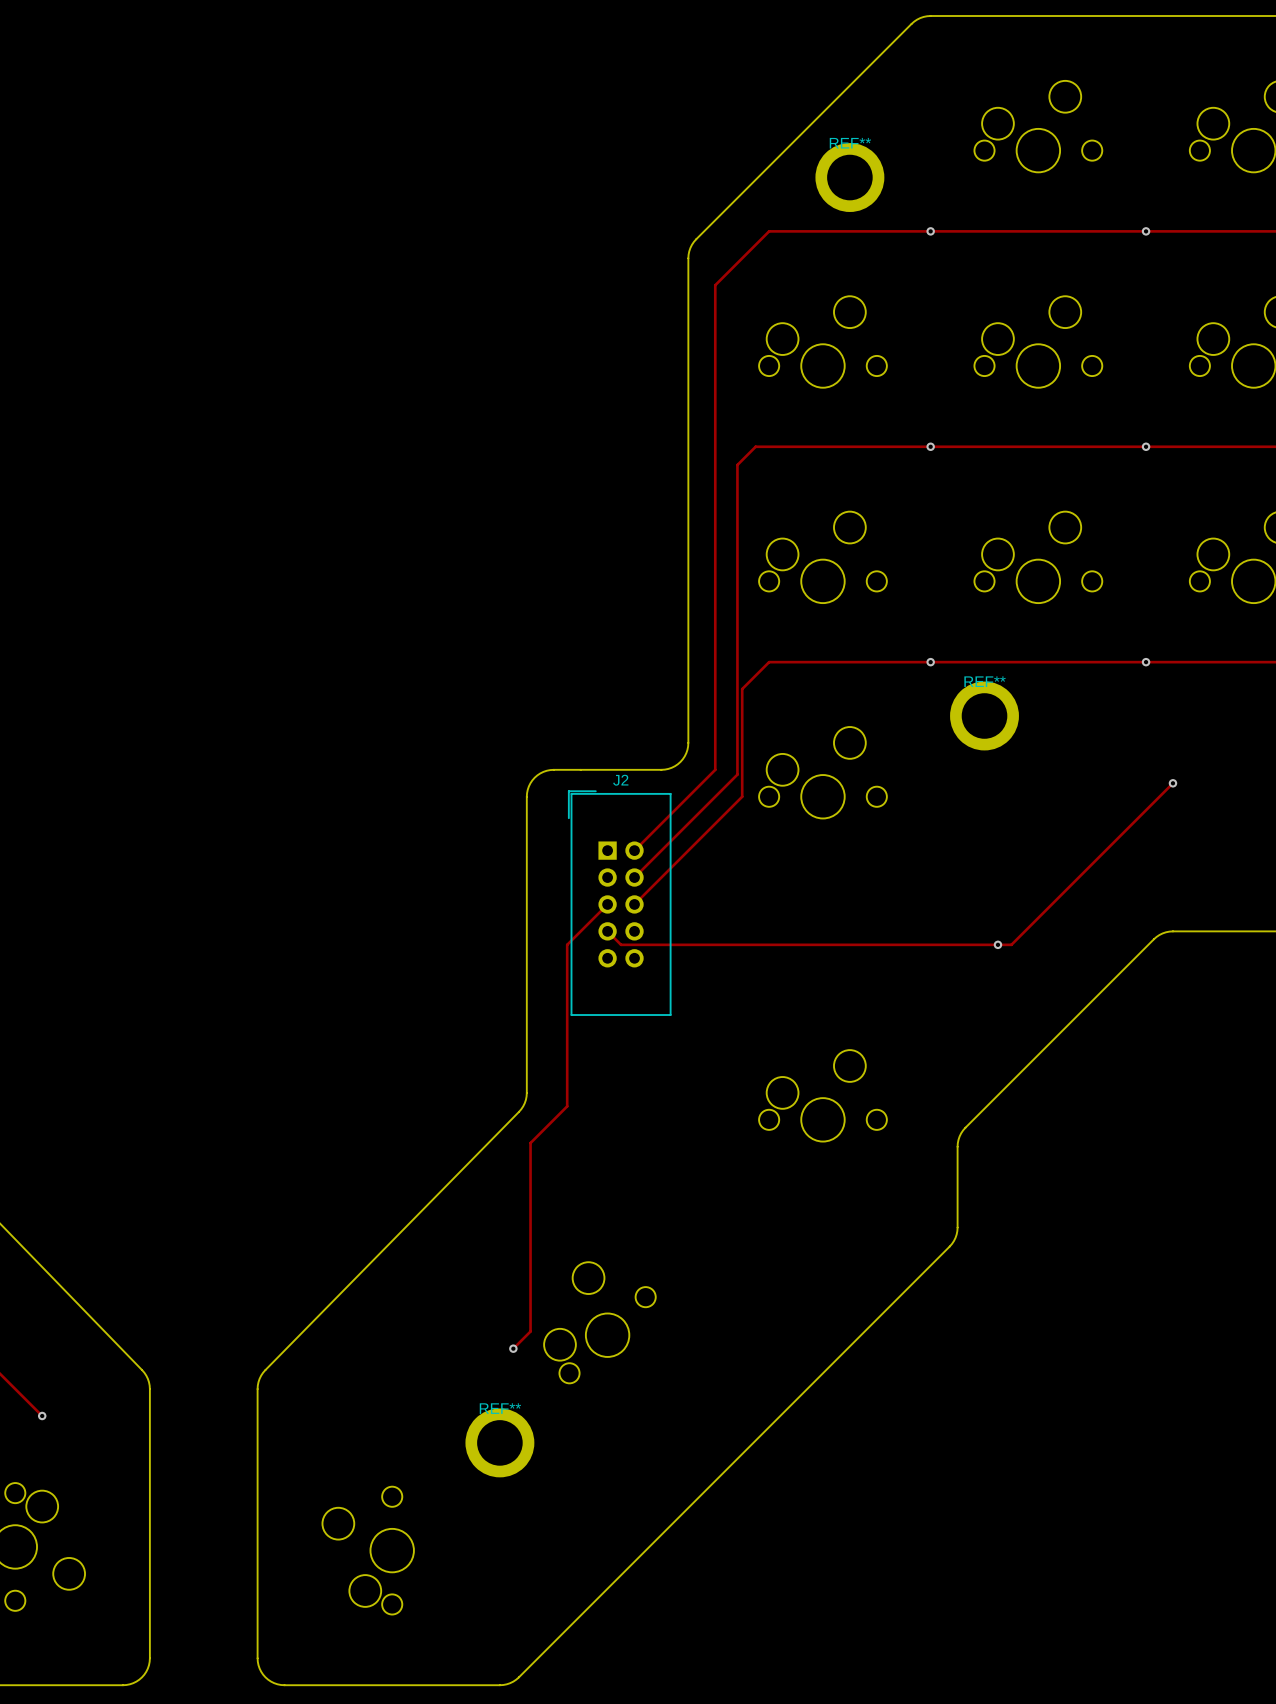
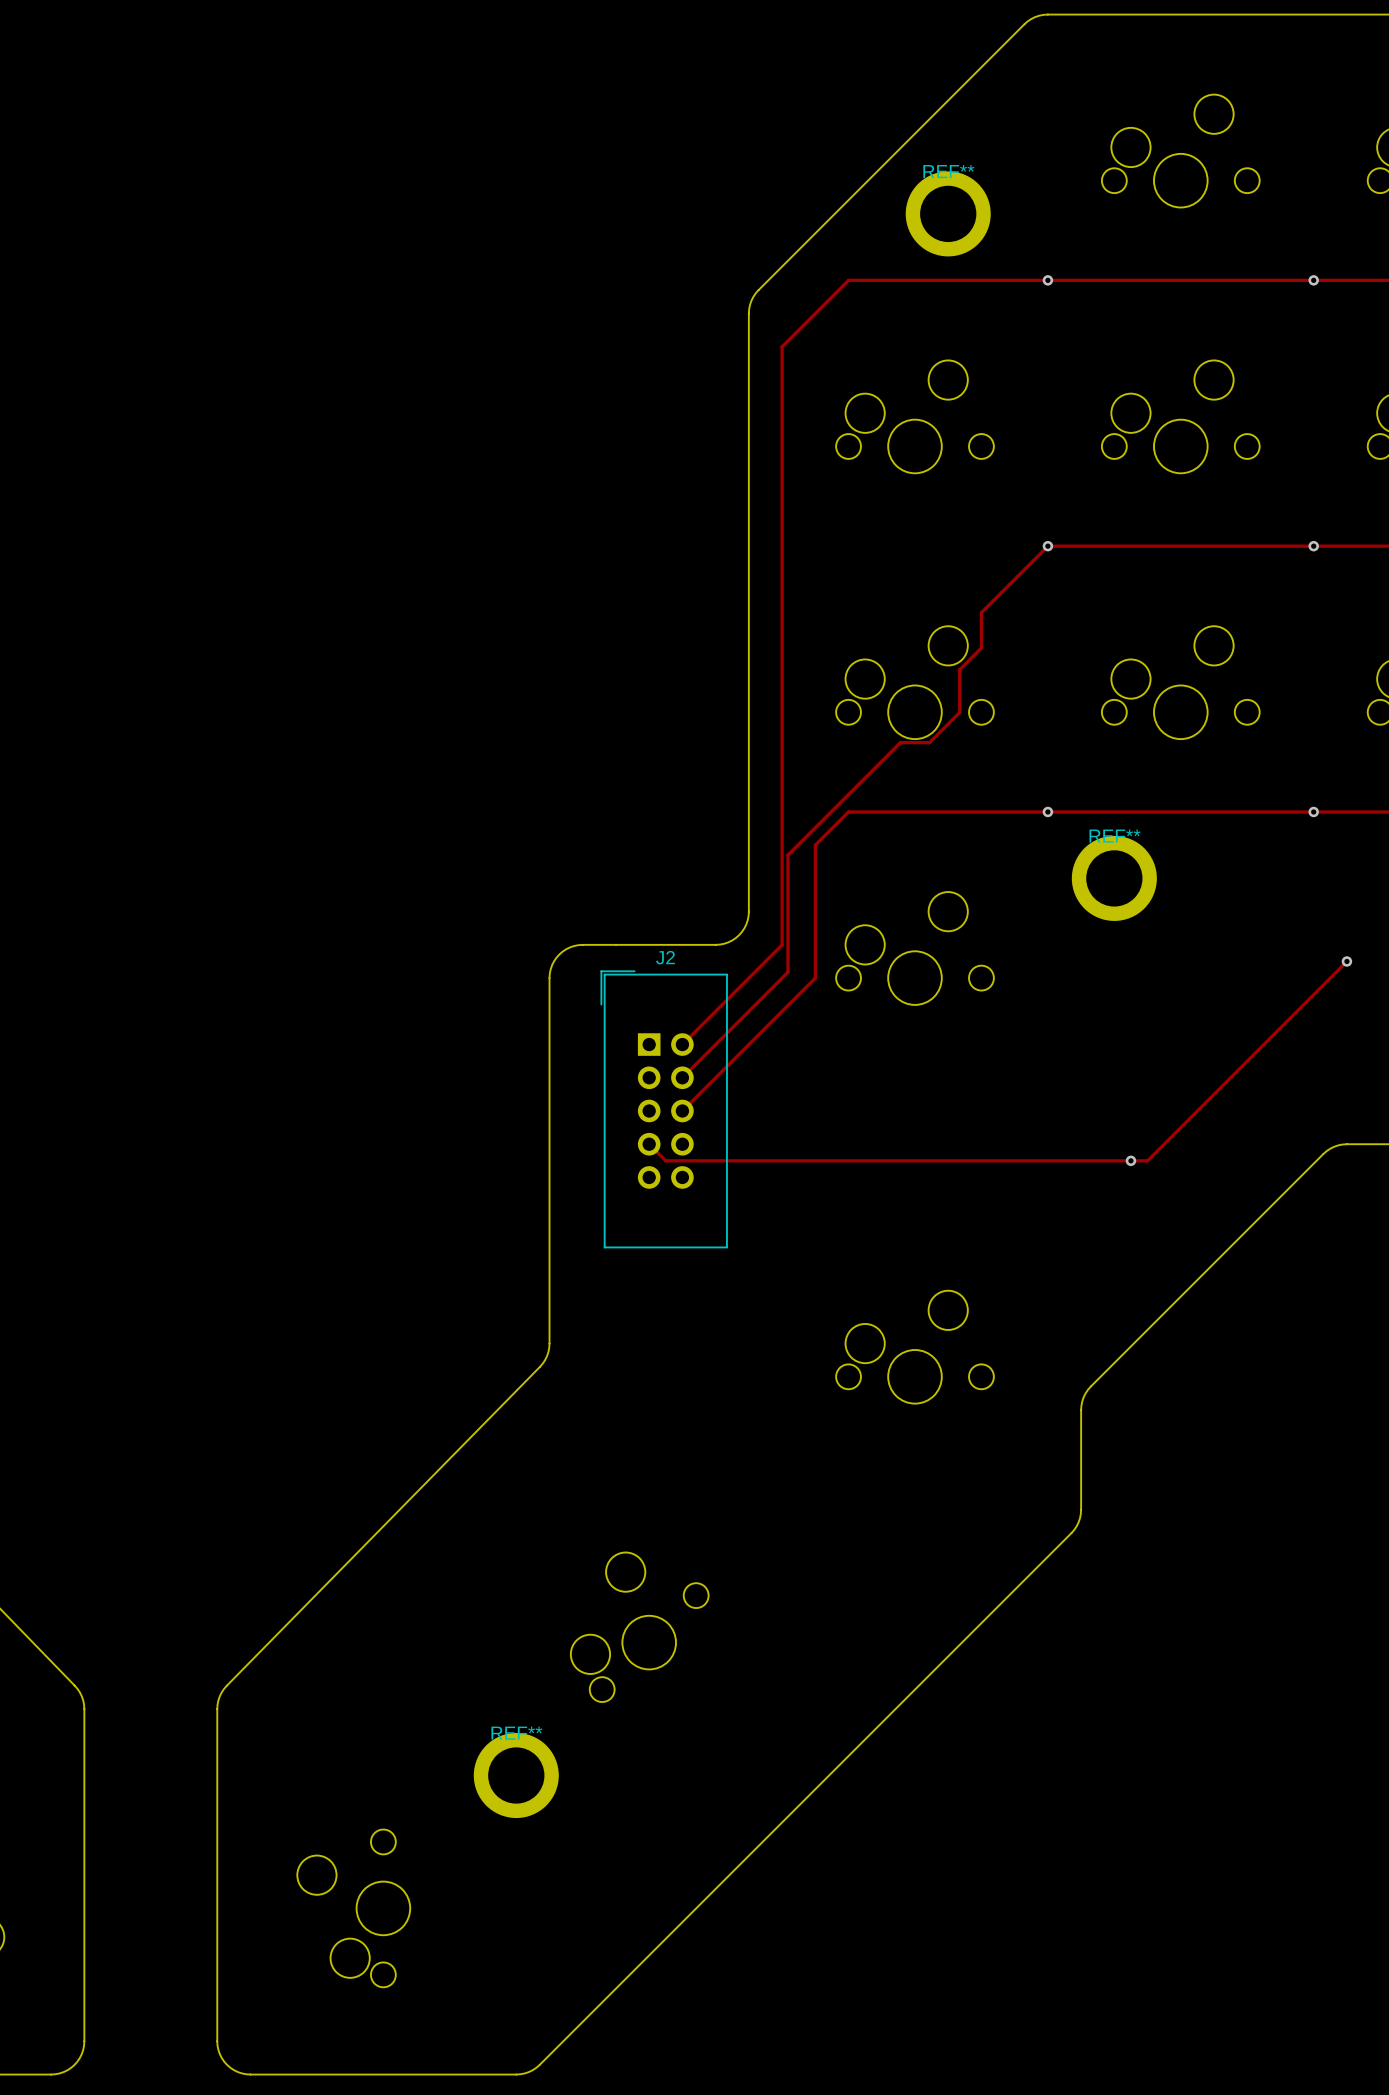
track: (930, 446) (755, 446) (737, 464) (737, 774) (720, 791) -> (1047, 546) (981, 612) (981, 647) (959, 669) (959, 712) (929, 742) (900, 742) (787, 855) (787, 972)
track: (607, 904) (567, 944) (567, 1106) (530, 1143) (530, 1331) (513, 1348) -> none
via: (513, 1348) -> none

